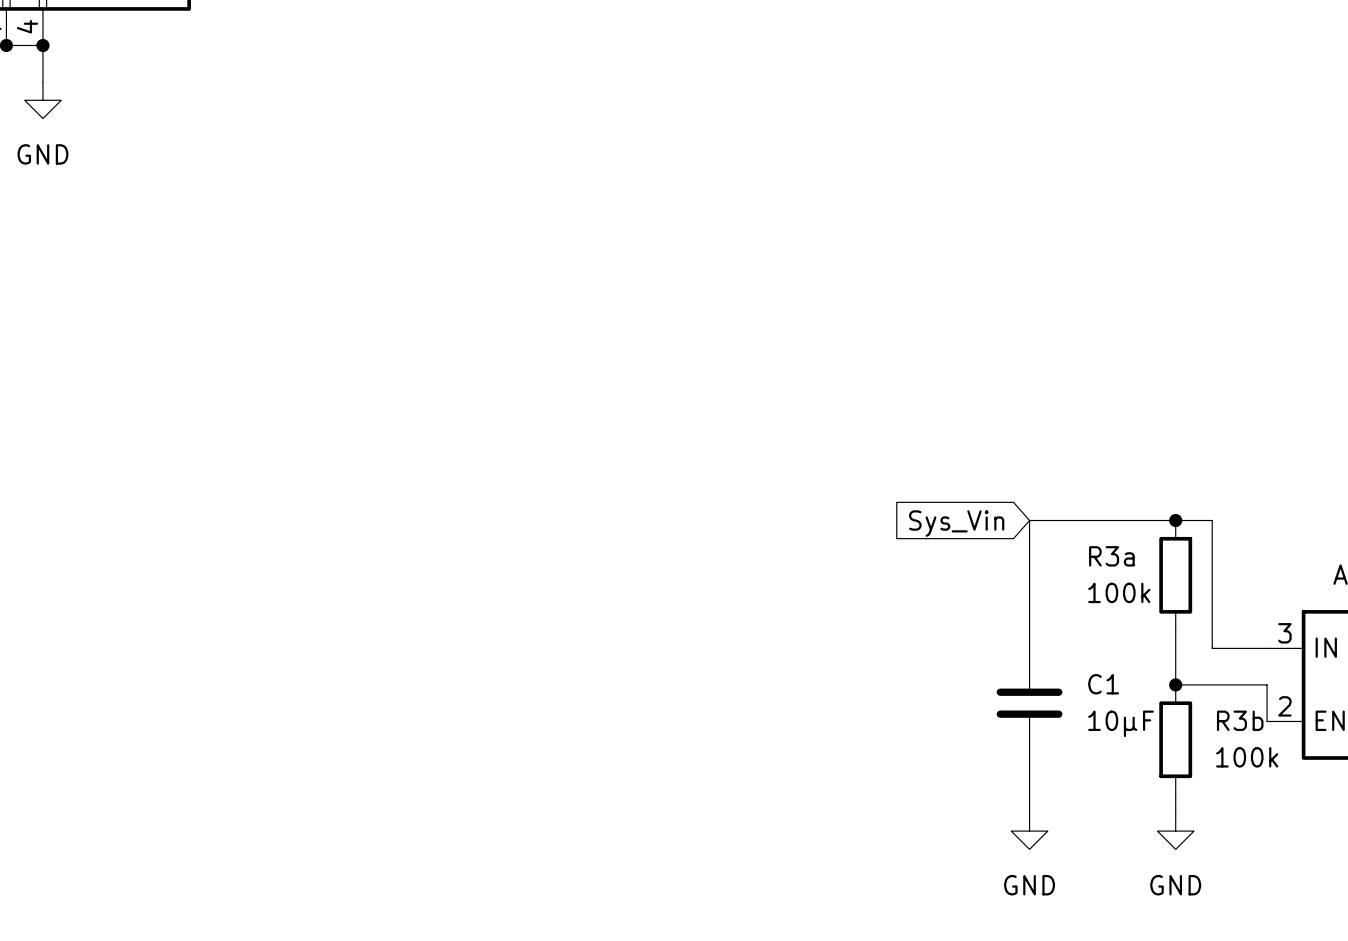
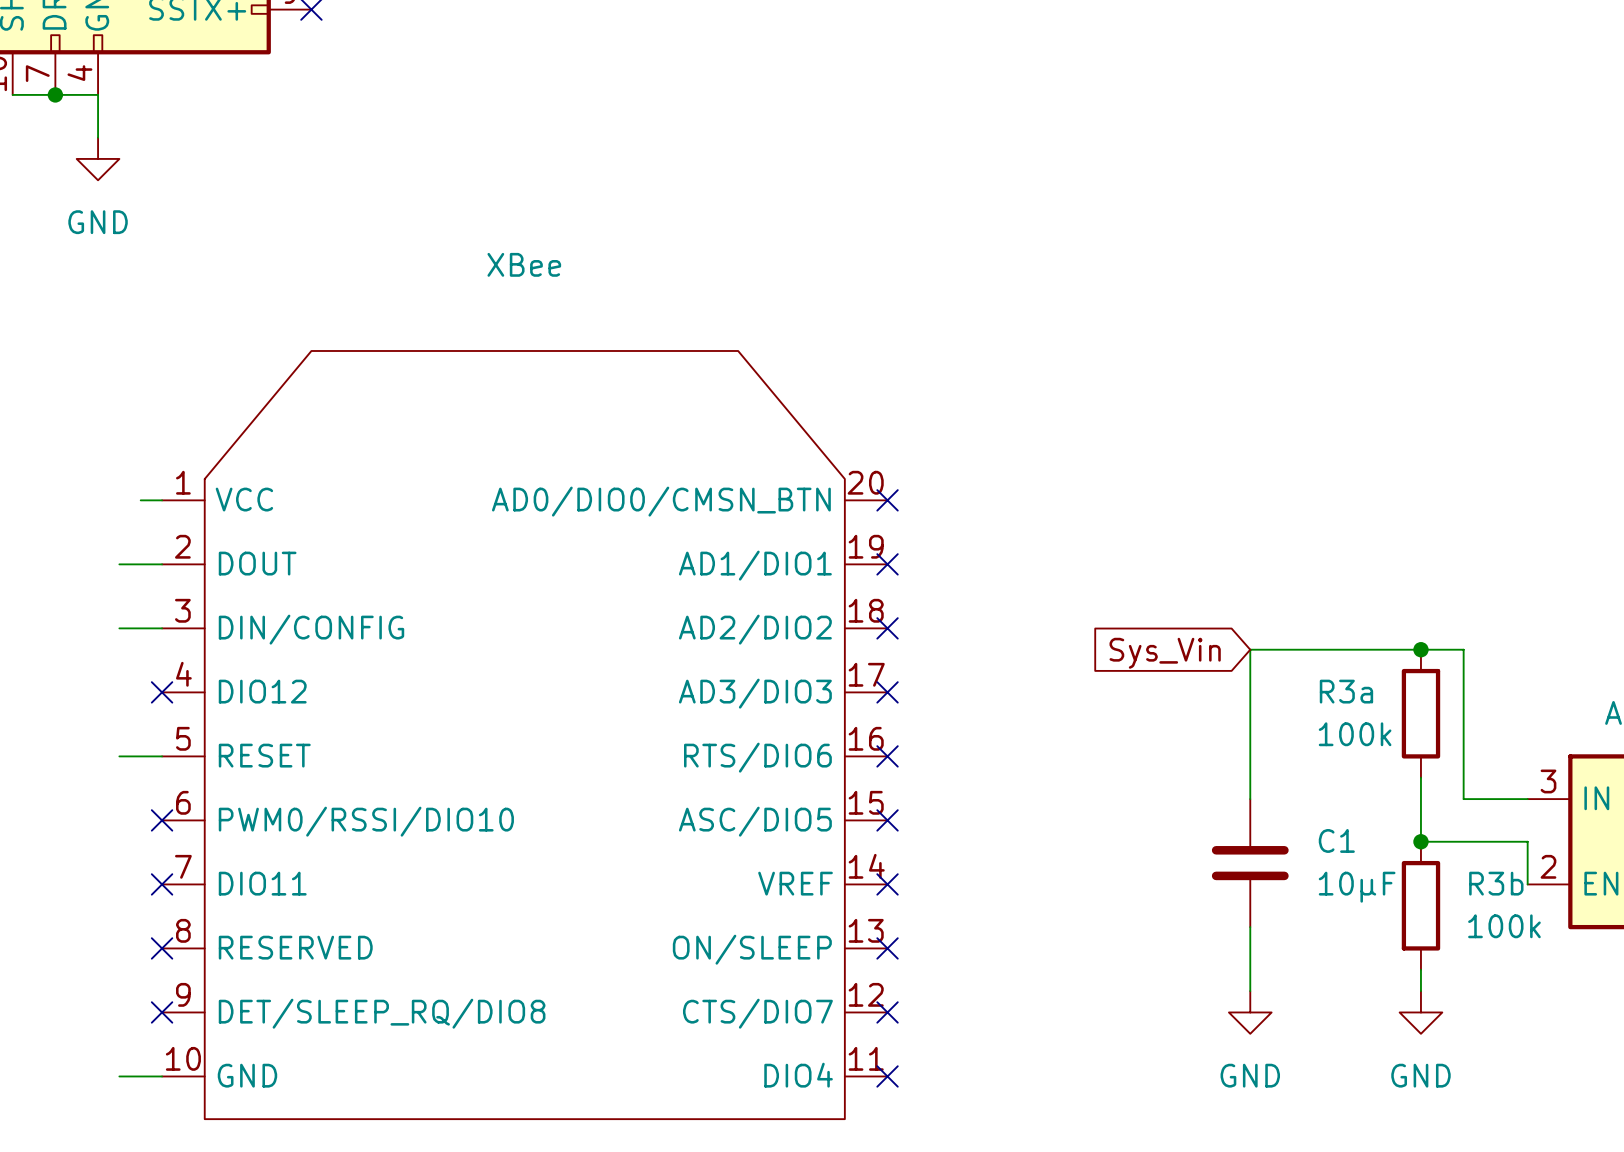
junction: (42, 45) -> none
wire: none -> (140, 500) (162, 500)
no-connect mark: none -> (887, 500)
wire: none -> (119, 564) (162, 564)
no-connect mark: none -> (887, 564)
wire: none -> (119, 628) (162, 628)
no-connect mark: none -> (887, 628)
no-connect mark: none -> (162, 692)
no-connect mark: none -> (887, 692)
XBee: none -> (524, 735)
wire: none -> (119, 756) (162, 756)
no-connect mark: none -> (887, 756)
no-connect mark: none -> (162, 820)
no-connect mark: none -> (887, 820)
no-connect mark: none -> (162, 884)
no-connect mark: none -> (887, 884)
no-connect mark: none -> (162, 948)
no-connect mark: none -> (887, 948)
no-connect mark: none -> (162, 1012)
no-connect mark: none -> (887, 1012)
wire: none -> (119, 1076) (162, 1076)
no-connect mark: none -> (887, 1076)

